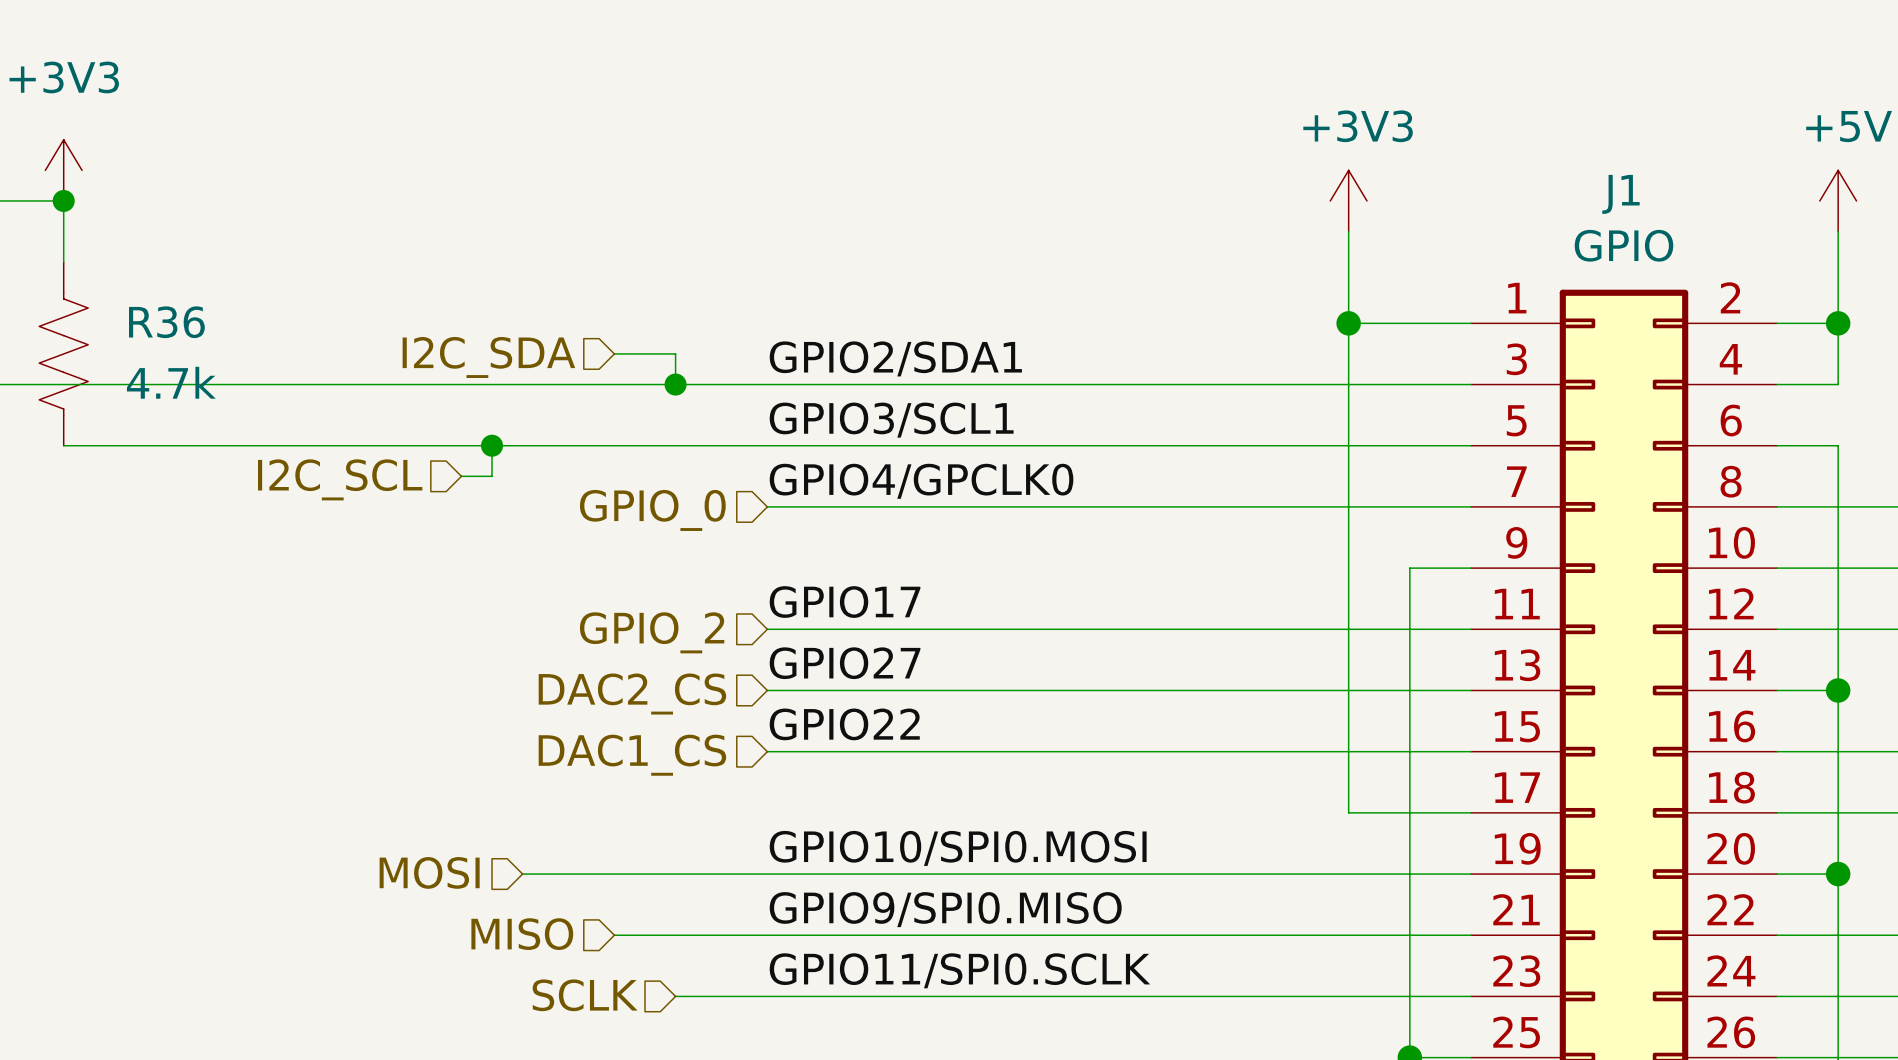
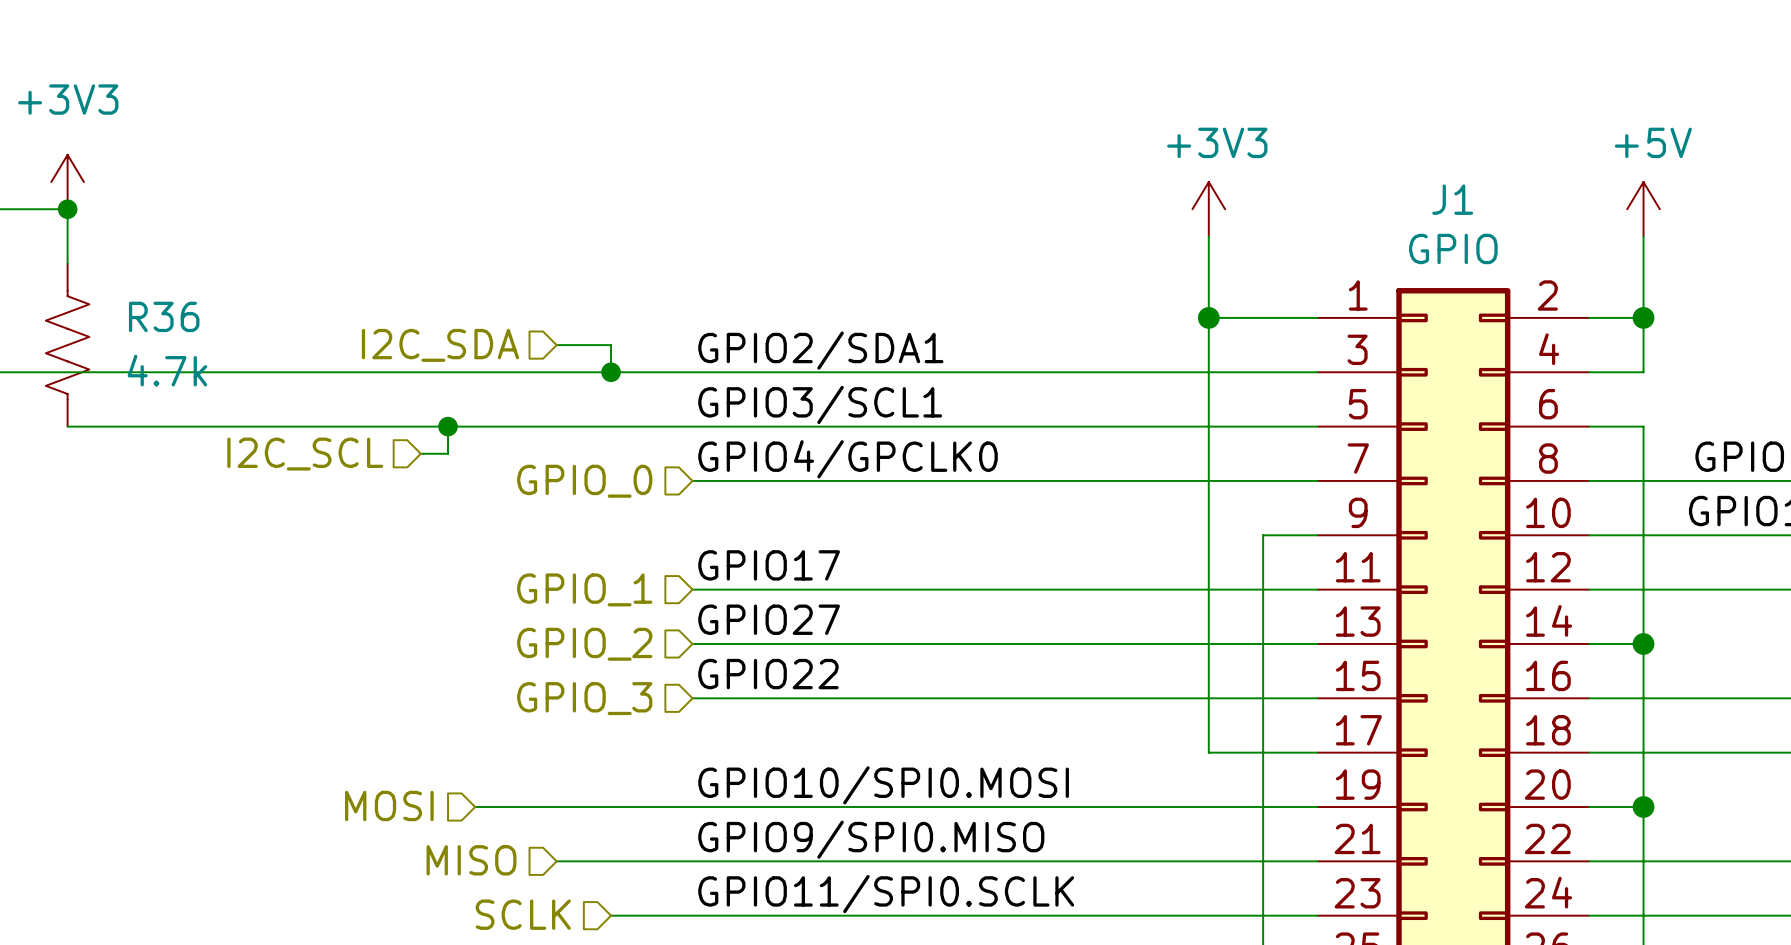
hierarchical label: GPIO_2 (652, 632) -> GPIO_1 (584, 589)
hierarchical label: DAC2_CS (632, 694) -> GPIO_2 (584, 644)
hierarchical label: DAC1_CS (632, 755) -> GPIO_3 (584, 698)

